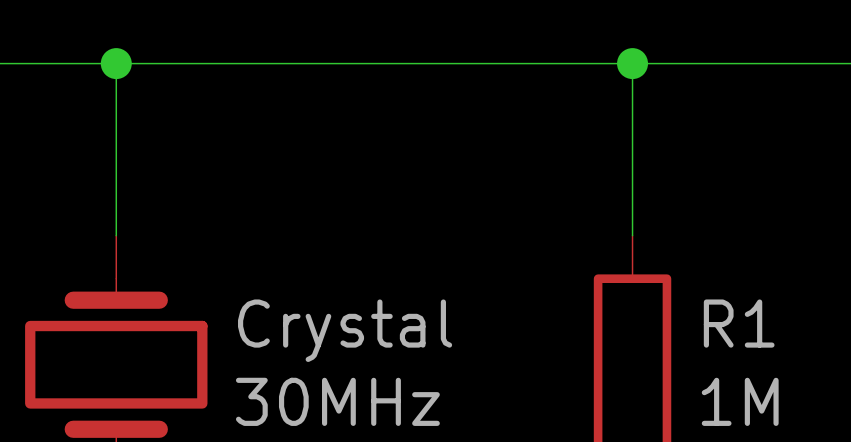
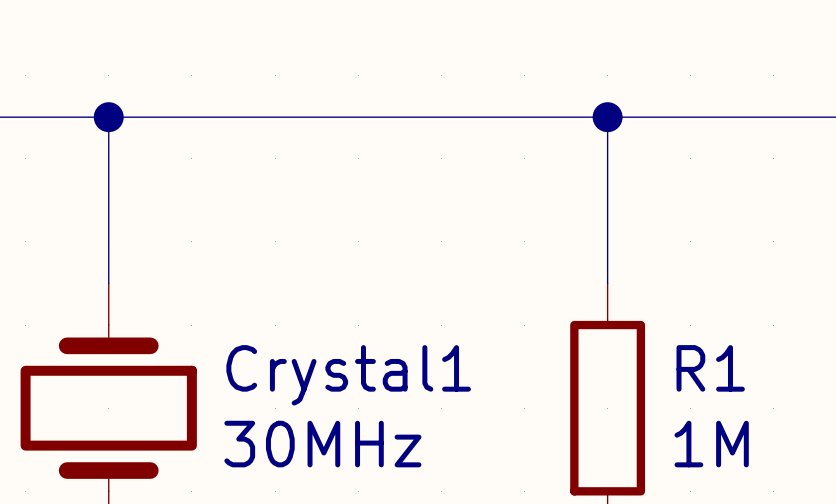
Crystal name: Crystal (345, 330) -> Crystal1 (348, 375)

